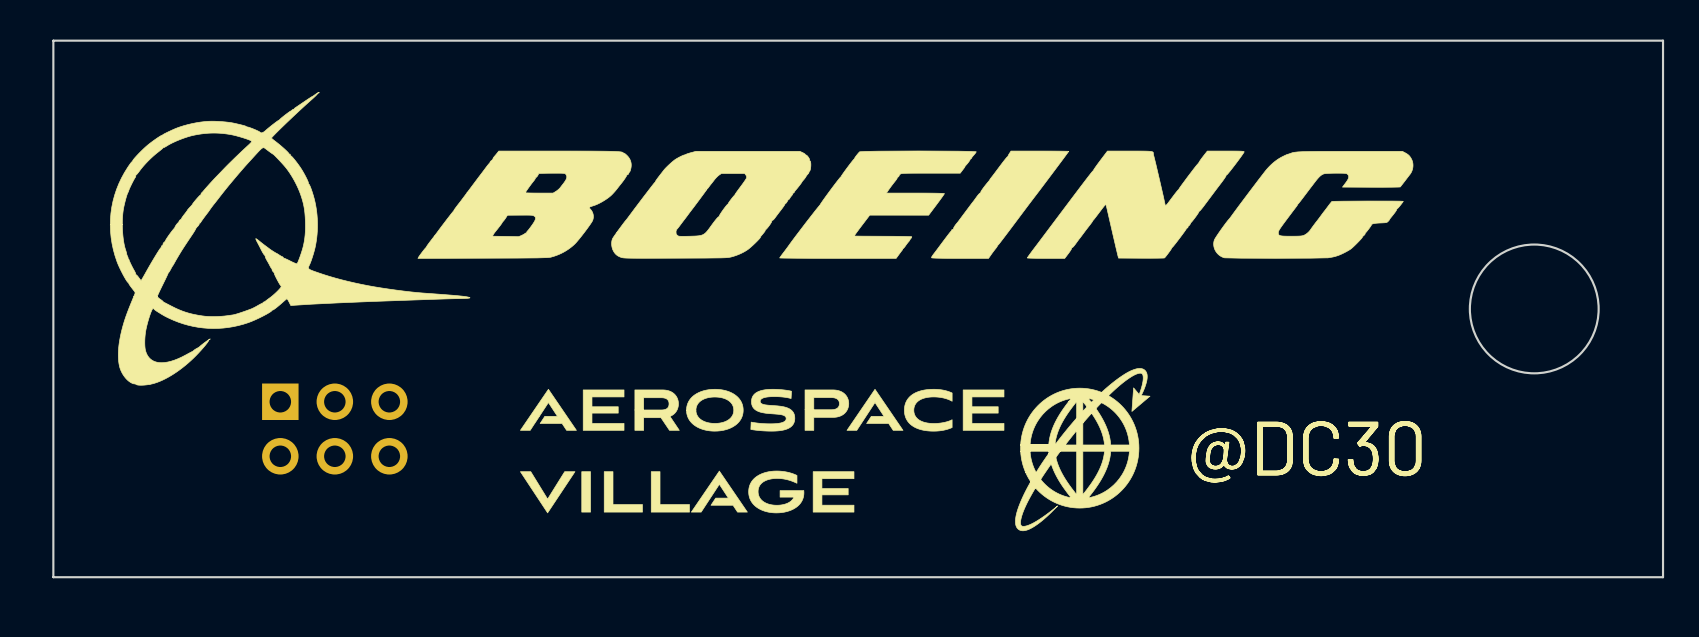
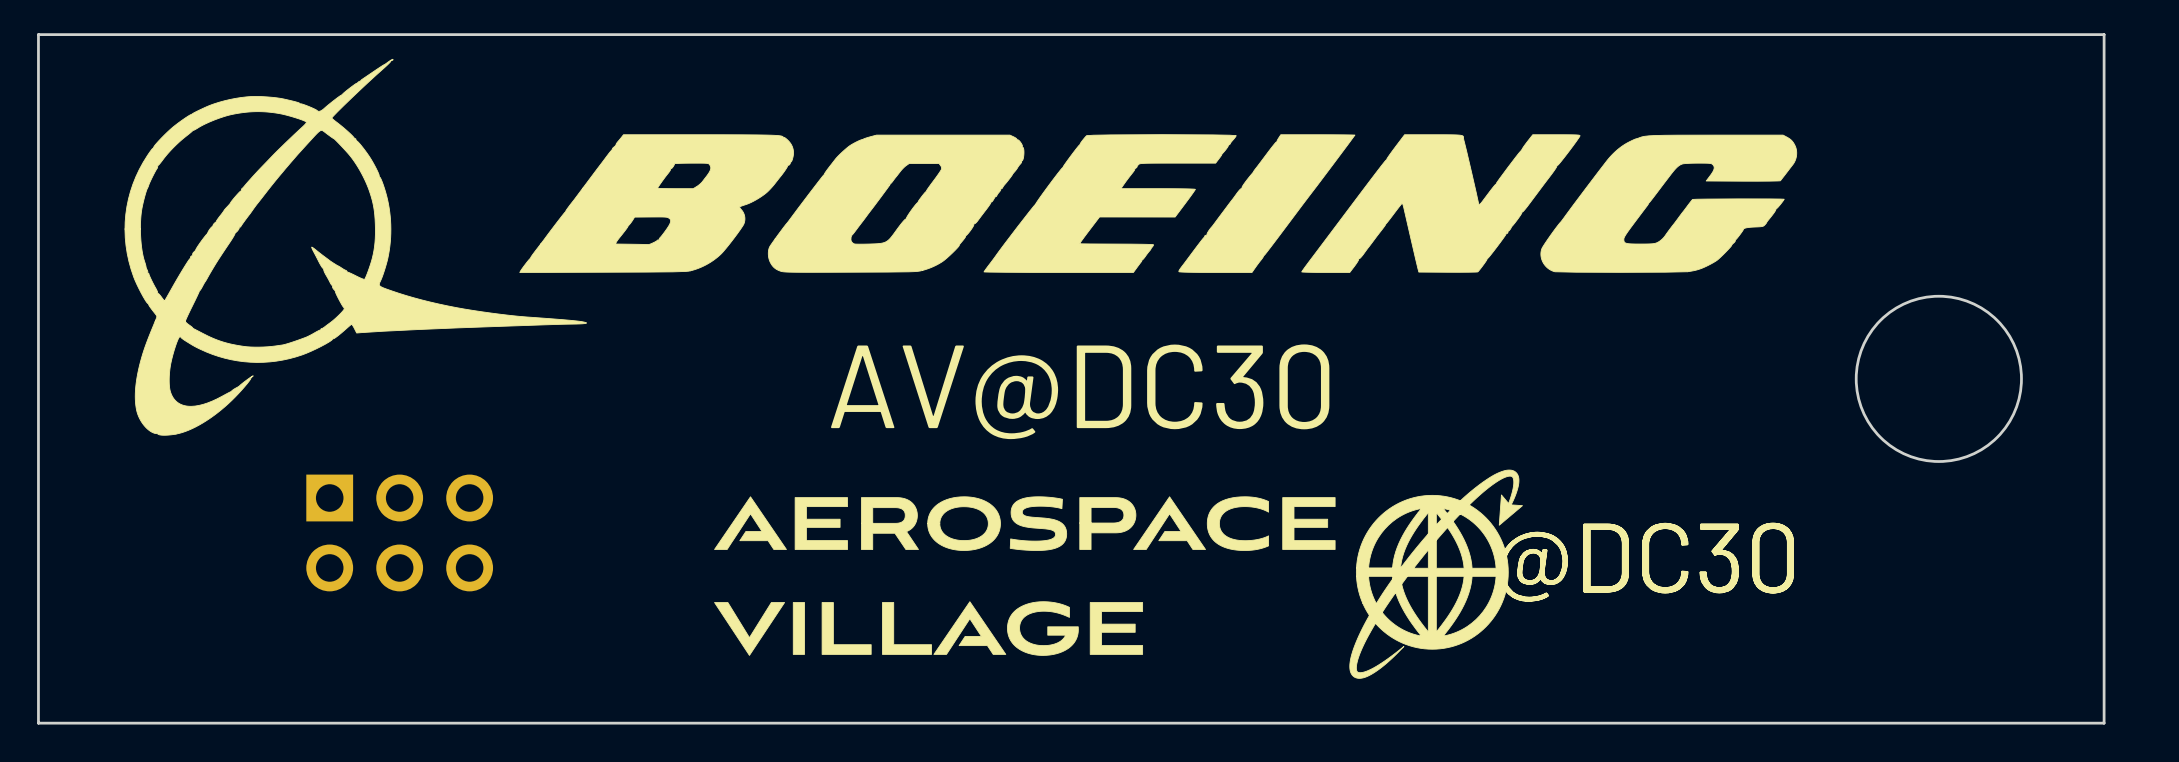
drawing: none -> [767, 134, 1237, 273]
drawing: none -> [1301, 134, 1581, 273]
drawing: [611, 150, 977, 259] -> none
drawing: [1026, 150, 1245, 259] -> none
drawing position: (524, 204) -> (656, 203)
drawing position: (1000, 204) -> (1266, 203)
drawing position: (1313, 204) -> (1668, 203)
drawing position: (290, 238) -> (355, 247)
text: none -> AV@DC30 (1080, 391)
drawing position: (1096, 404) -> (1453, 515)
drawing position: (548, 409) -> (750, 523)
drawing position: (874, 409) -> (1169, 523)
drawing position: (603, 410) -> (821, 523)
drawing position: (657, 410) -> (889, 523)
drawing position: (714, 410) -> (964, 523)
drawing position: (772, 410) -> (1038, 523)
drawing position: (826, 410) -> (1107, 523)
drawing position: (928, 410) -> (1237, 523)
drawing position: (983, 410) -> (1308, 523)
drawing position: (1087, 415) -> (1441, 529)
drawing position: (1065, 431) -> (1414, 551)
drawing position: (1085, 438) -> (1439, 559)
drawing position: (1057, 454) -> (1404, 580)
drawing: [603, 471, 643, 513] -> none
drawing: none -> [882, 602, 932, 655]
drawing position: (586, 491) -> (798, 628)
drawing position: (670, 491) -> (846, 628)
drawing position: (719, 491) -> (969, 628)
drawing position: (776, 491) -> (1042, 628)
drawing position: (833, 491) -> (1116, 628)
drawing position: (547, 492) -> (749, 628)
drawing position: (1036, 506) -> (1376, 646)

